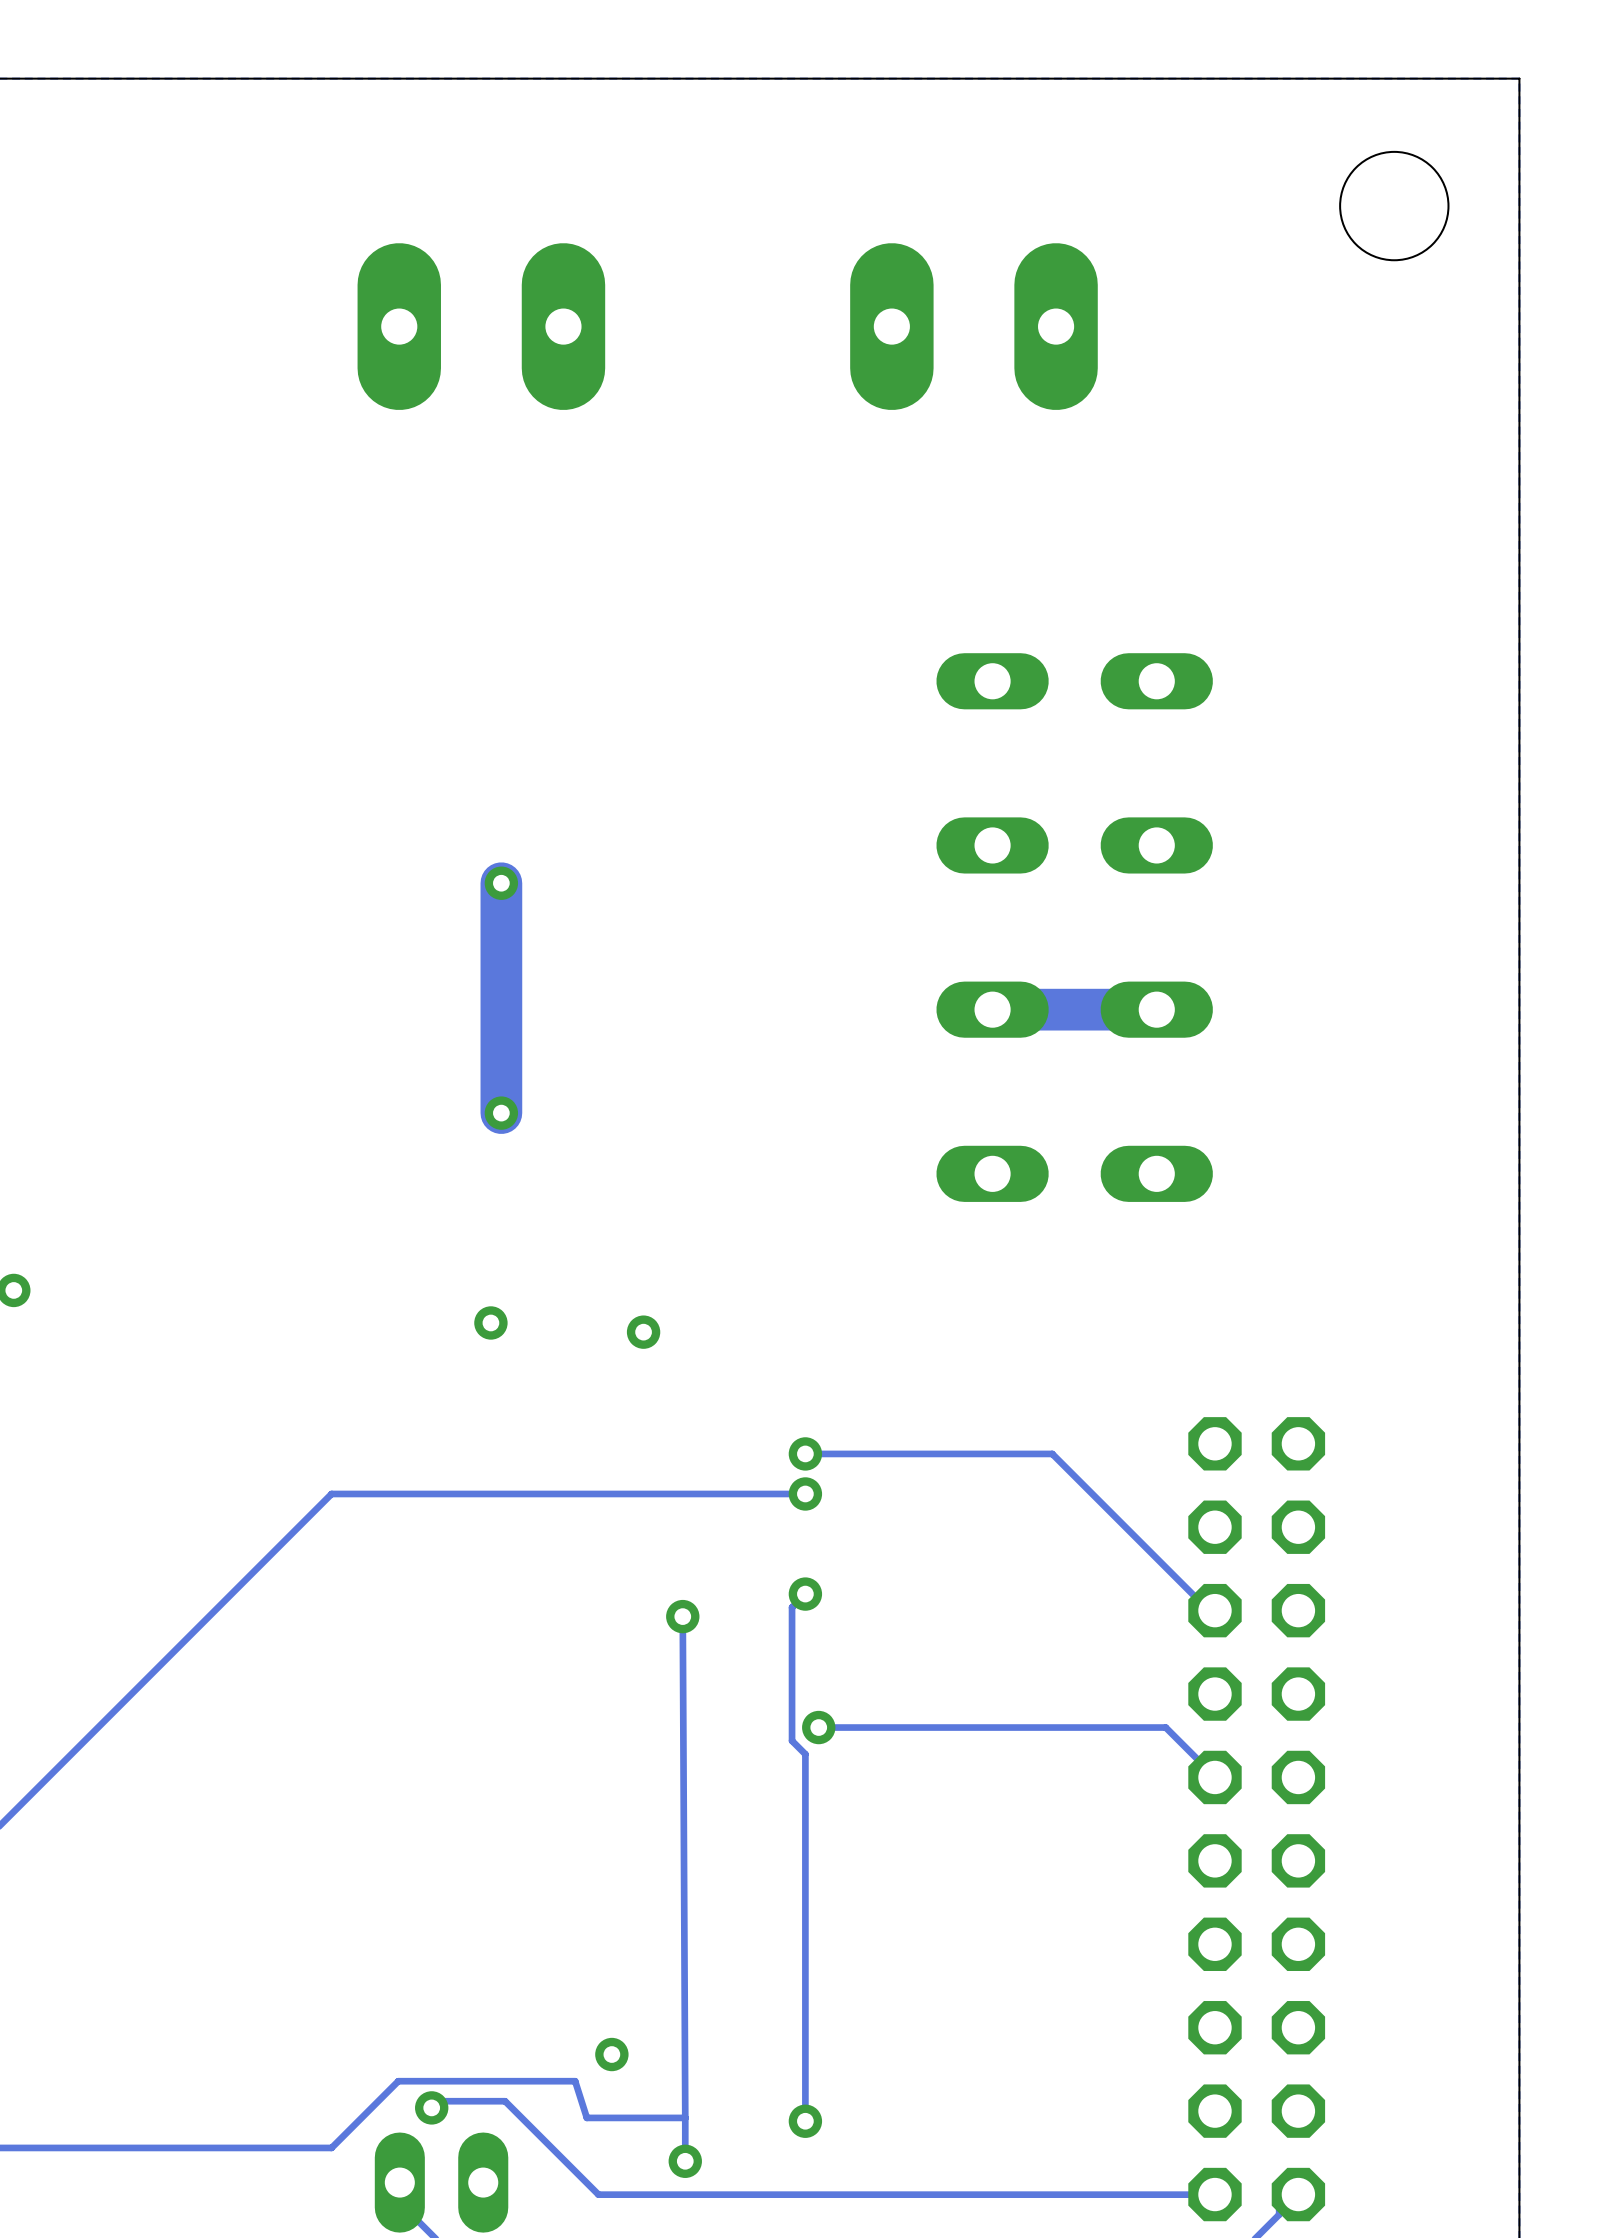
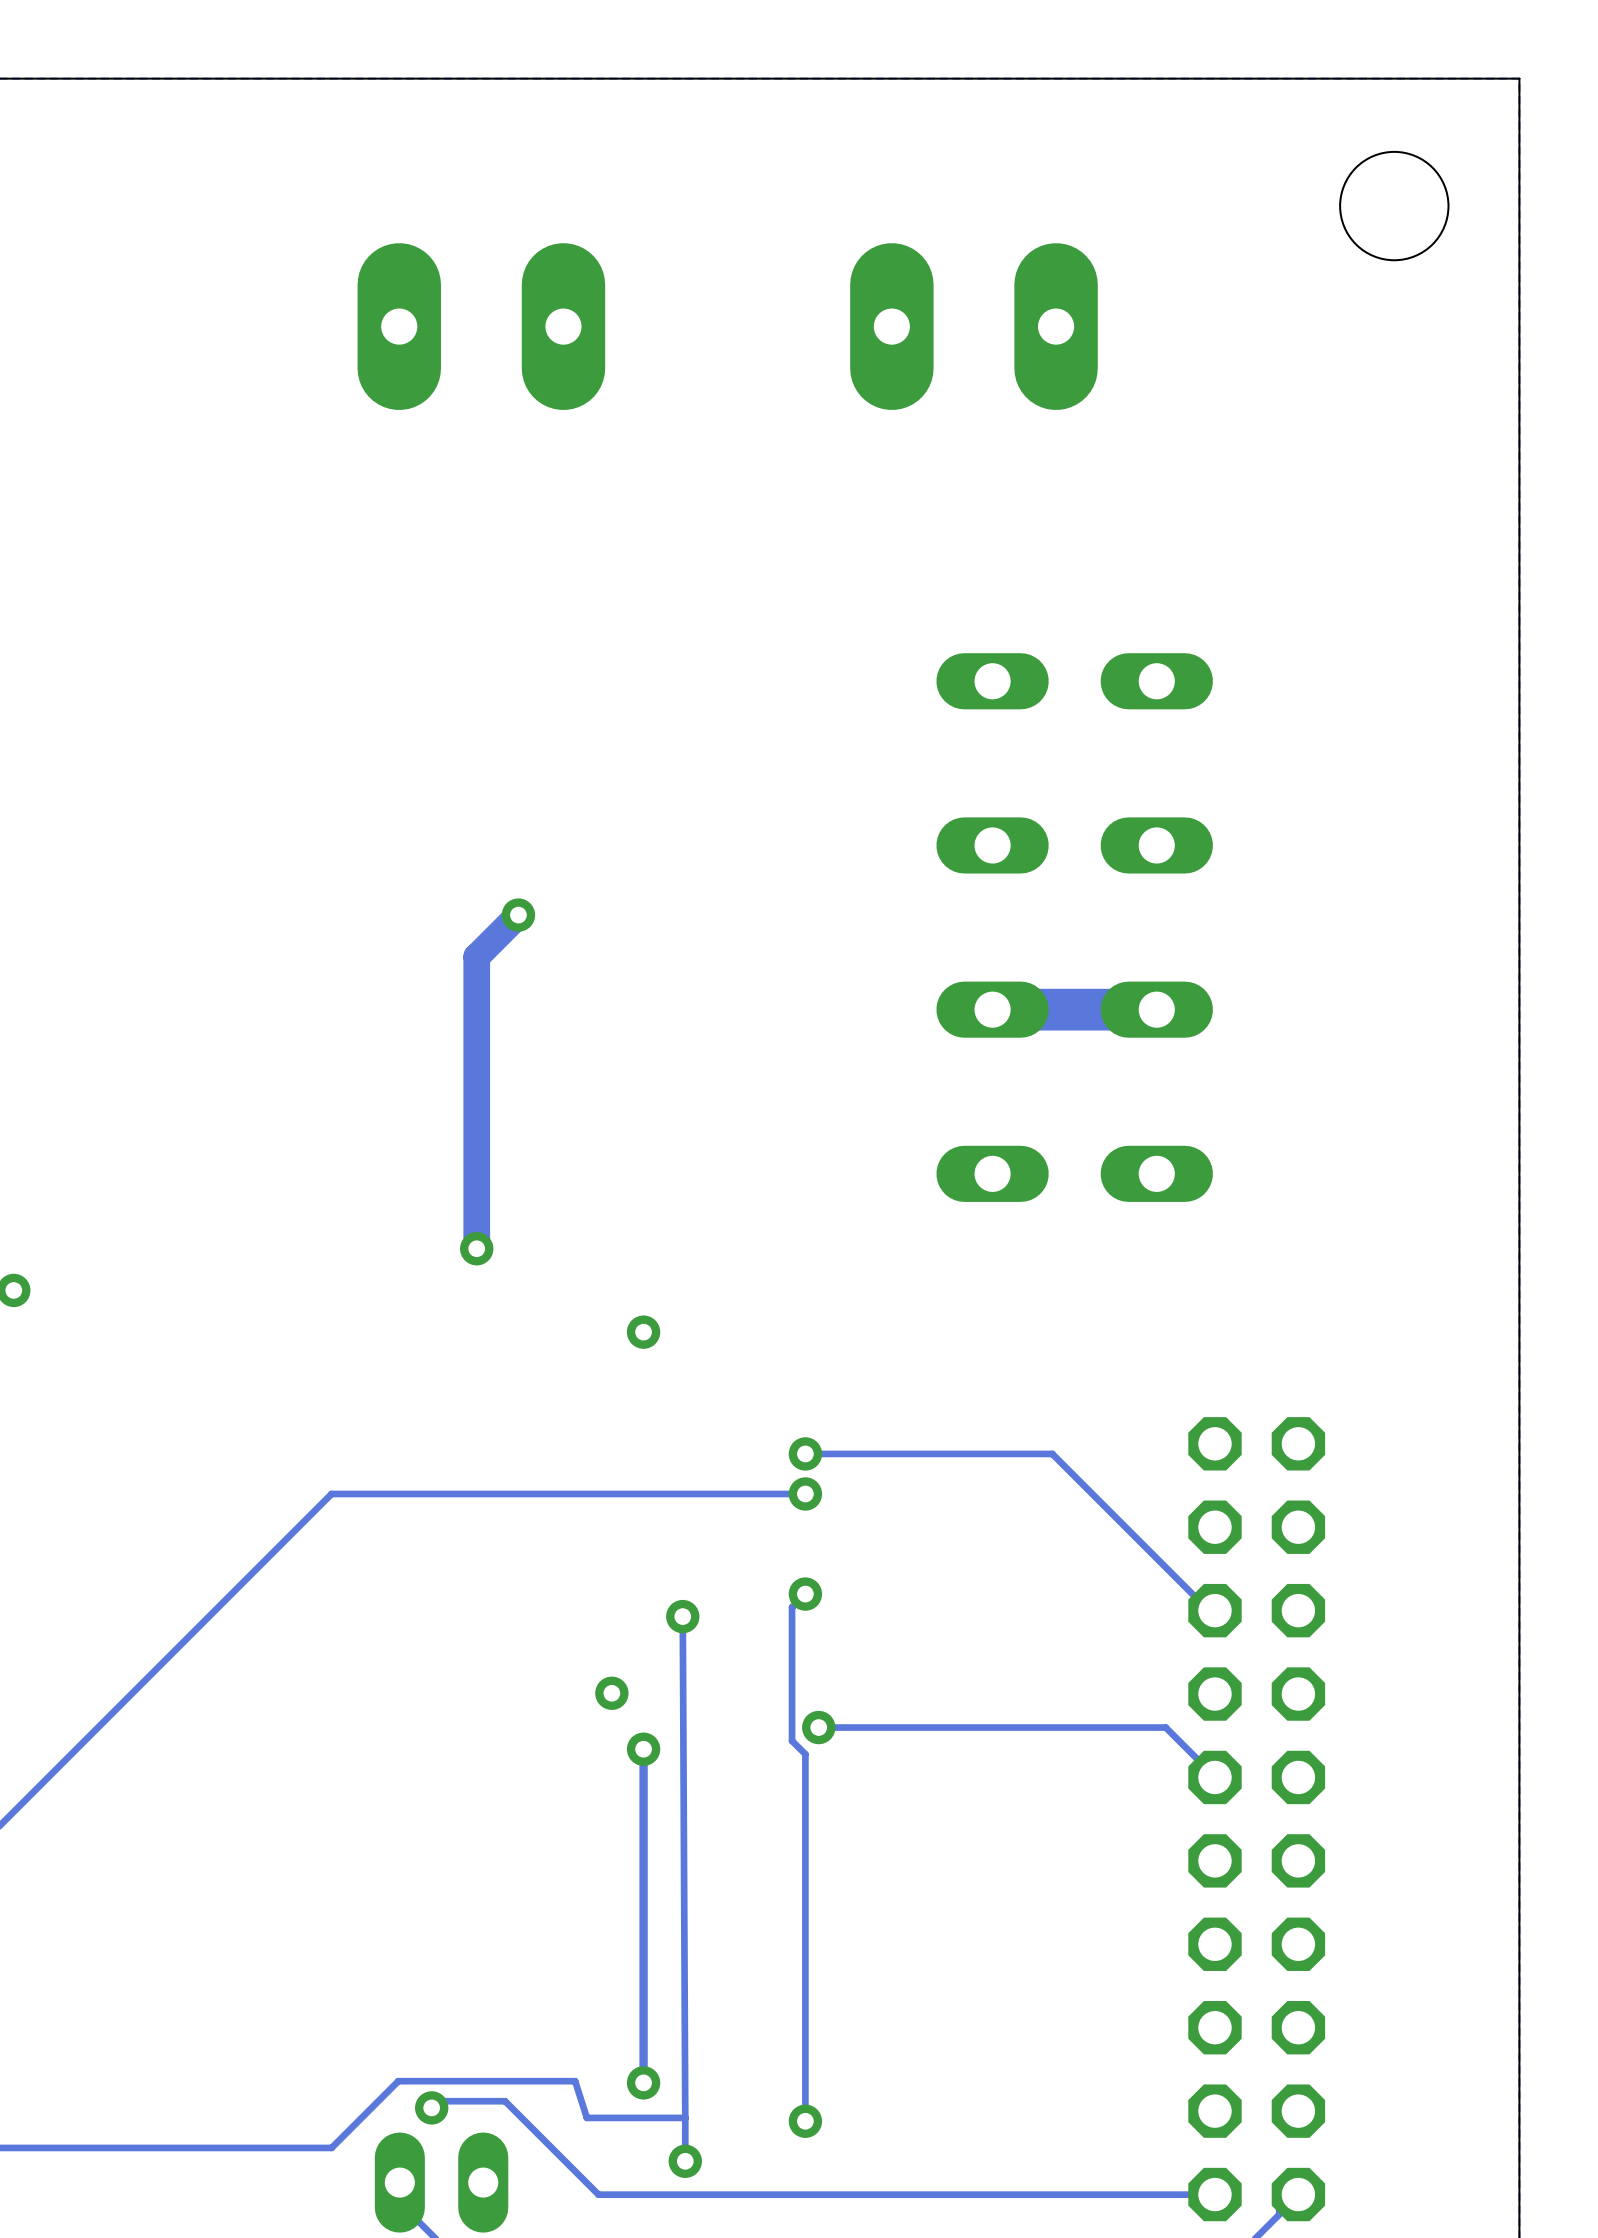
track: (501, 883) (501, 1113) -> none
via position: (501, 883) -> (518, 915)
track: none -> (518, 915) (476, 956) (476, 1248)
via: (501, 1113) -> none
via: none -> (476, 1248)
via: (490, 1322) -> none
via: none -> (611, 1693)
track: none -> (643, 1749) (643, 2082)
via: none -> (643, 1749)
via position: (611, 2054) -> (643, 2082)

